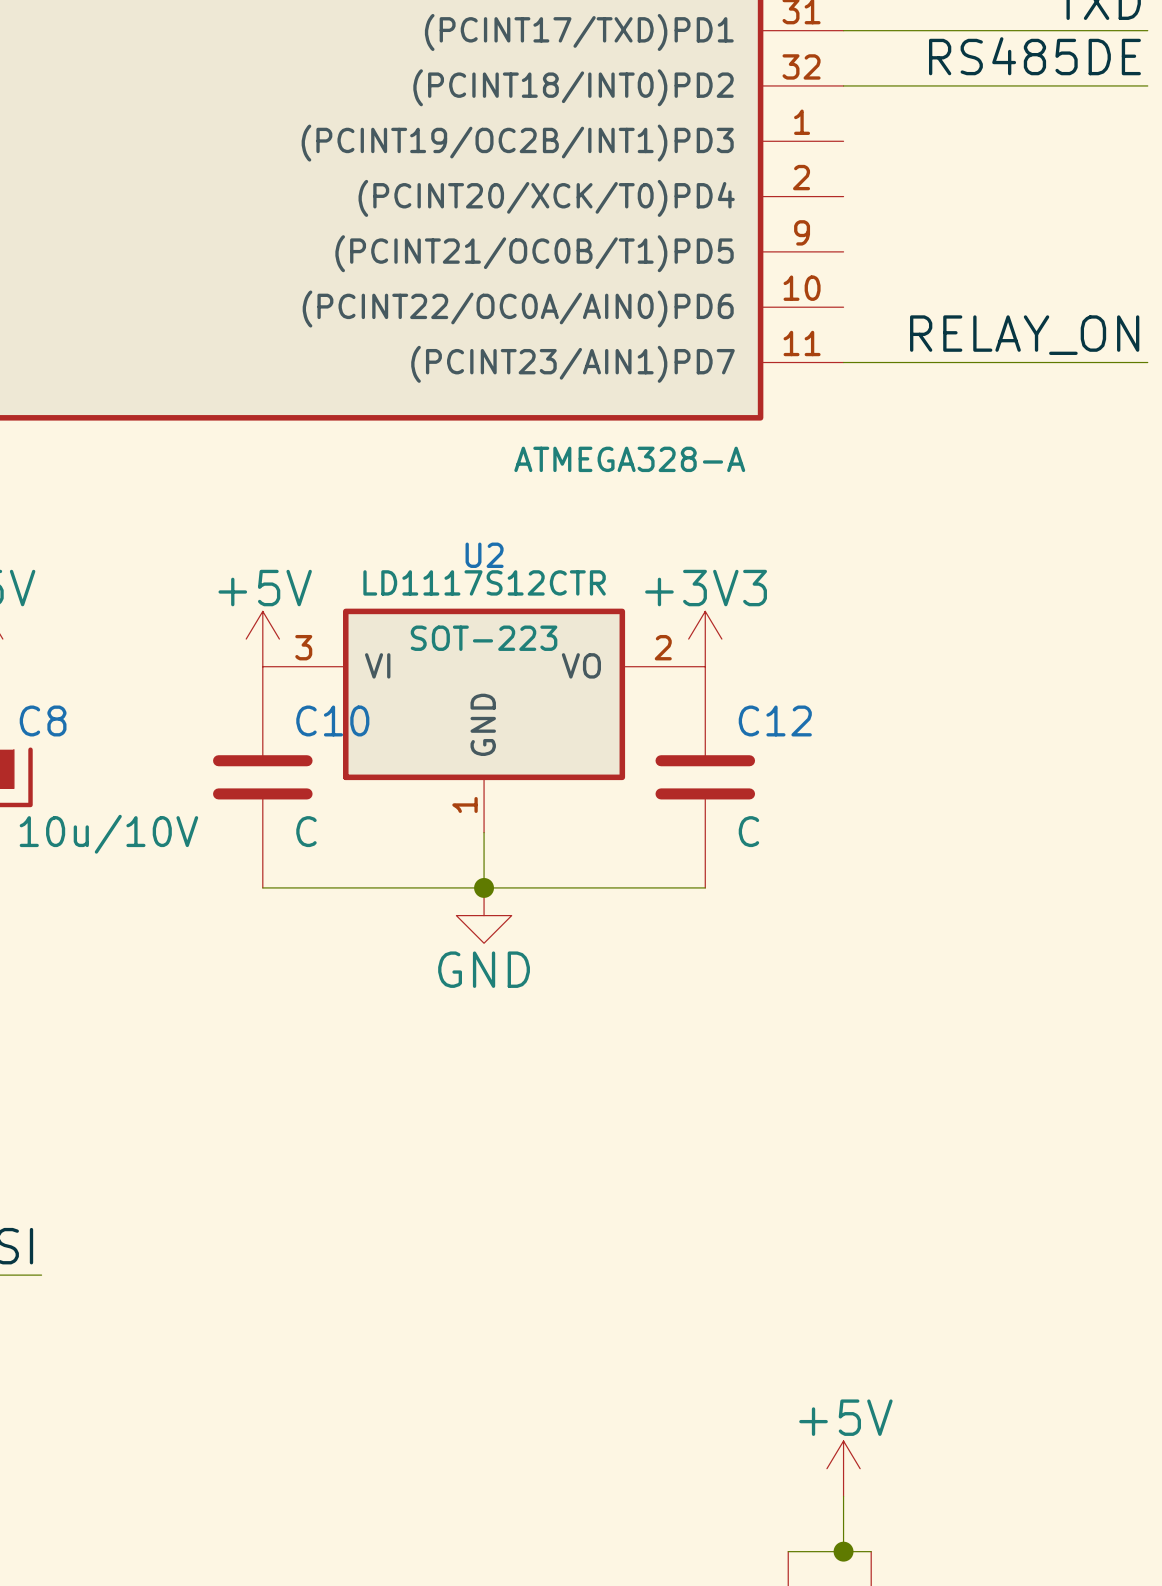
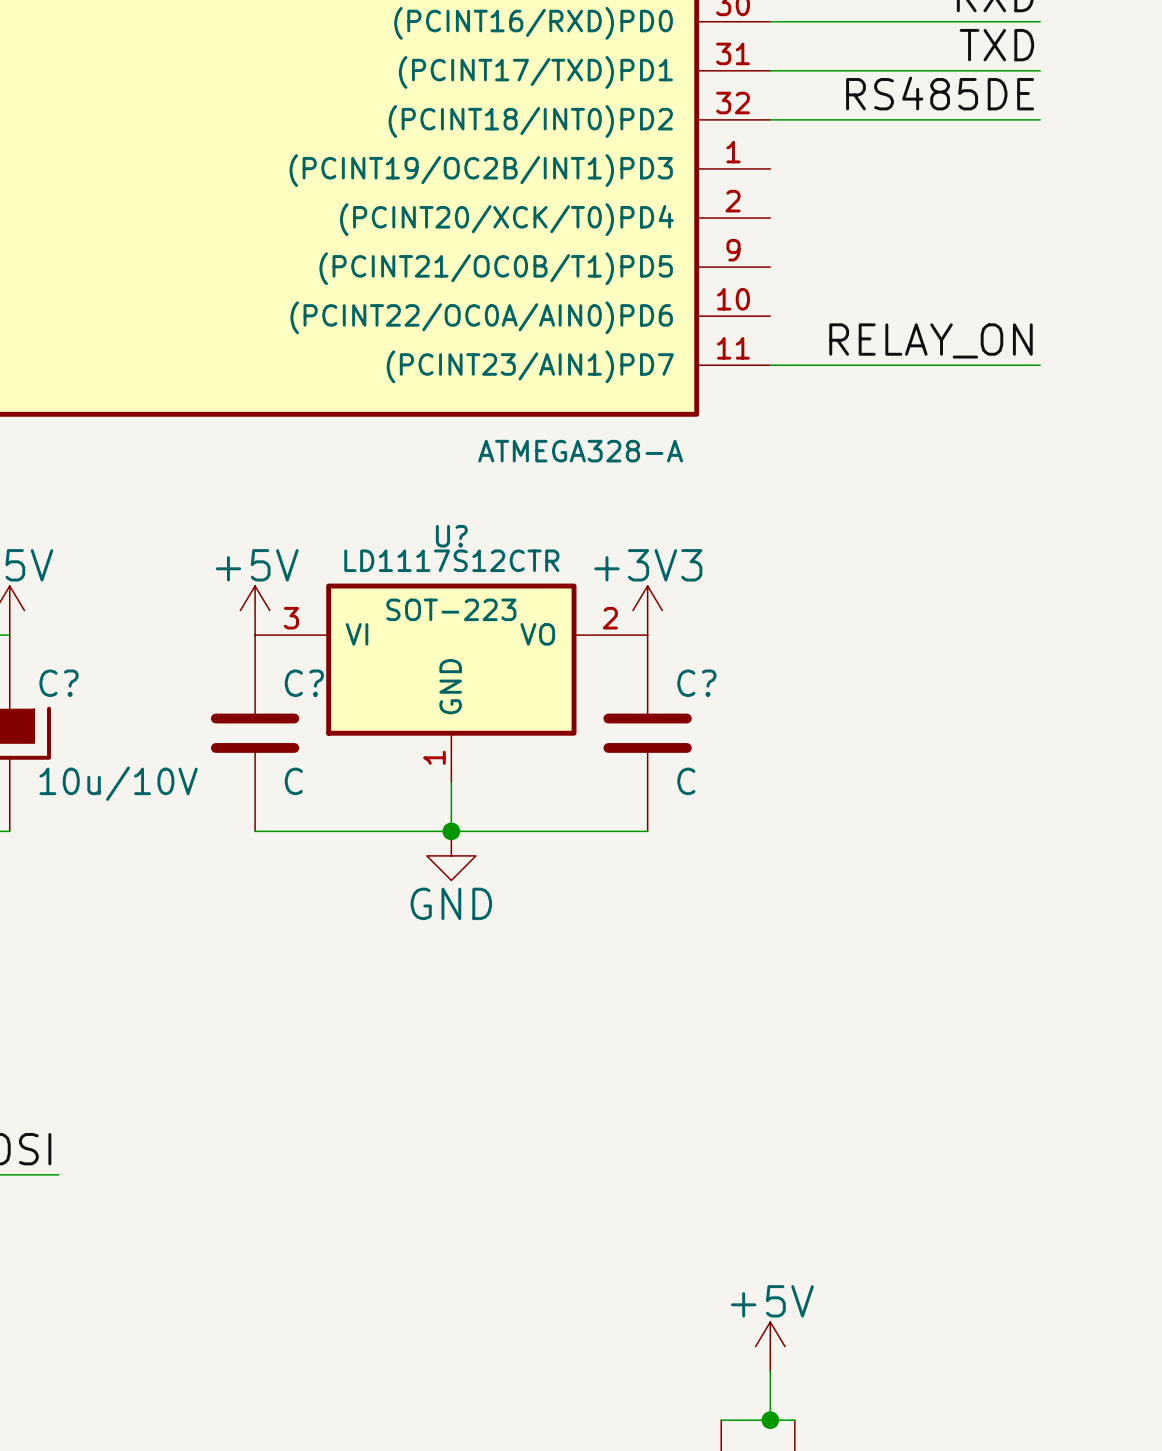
U2 name: U2 (484, 555) -> U? (451, 536)
C8 name: C8 (43, 720) -> C? (59, 683)
C10 name: C10 (332, 720) -> C? (304, 683)
C12 name: C12 (775, 720) -> C? (696, 683)

